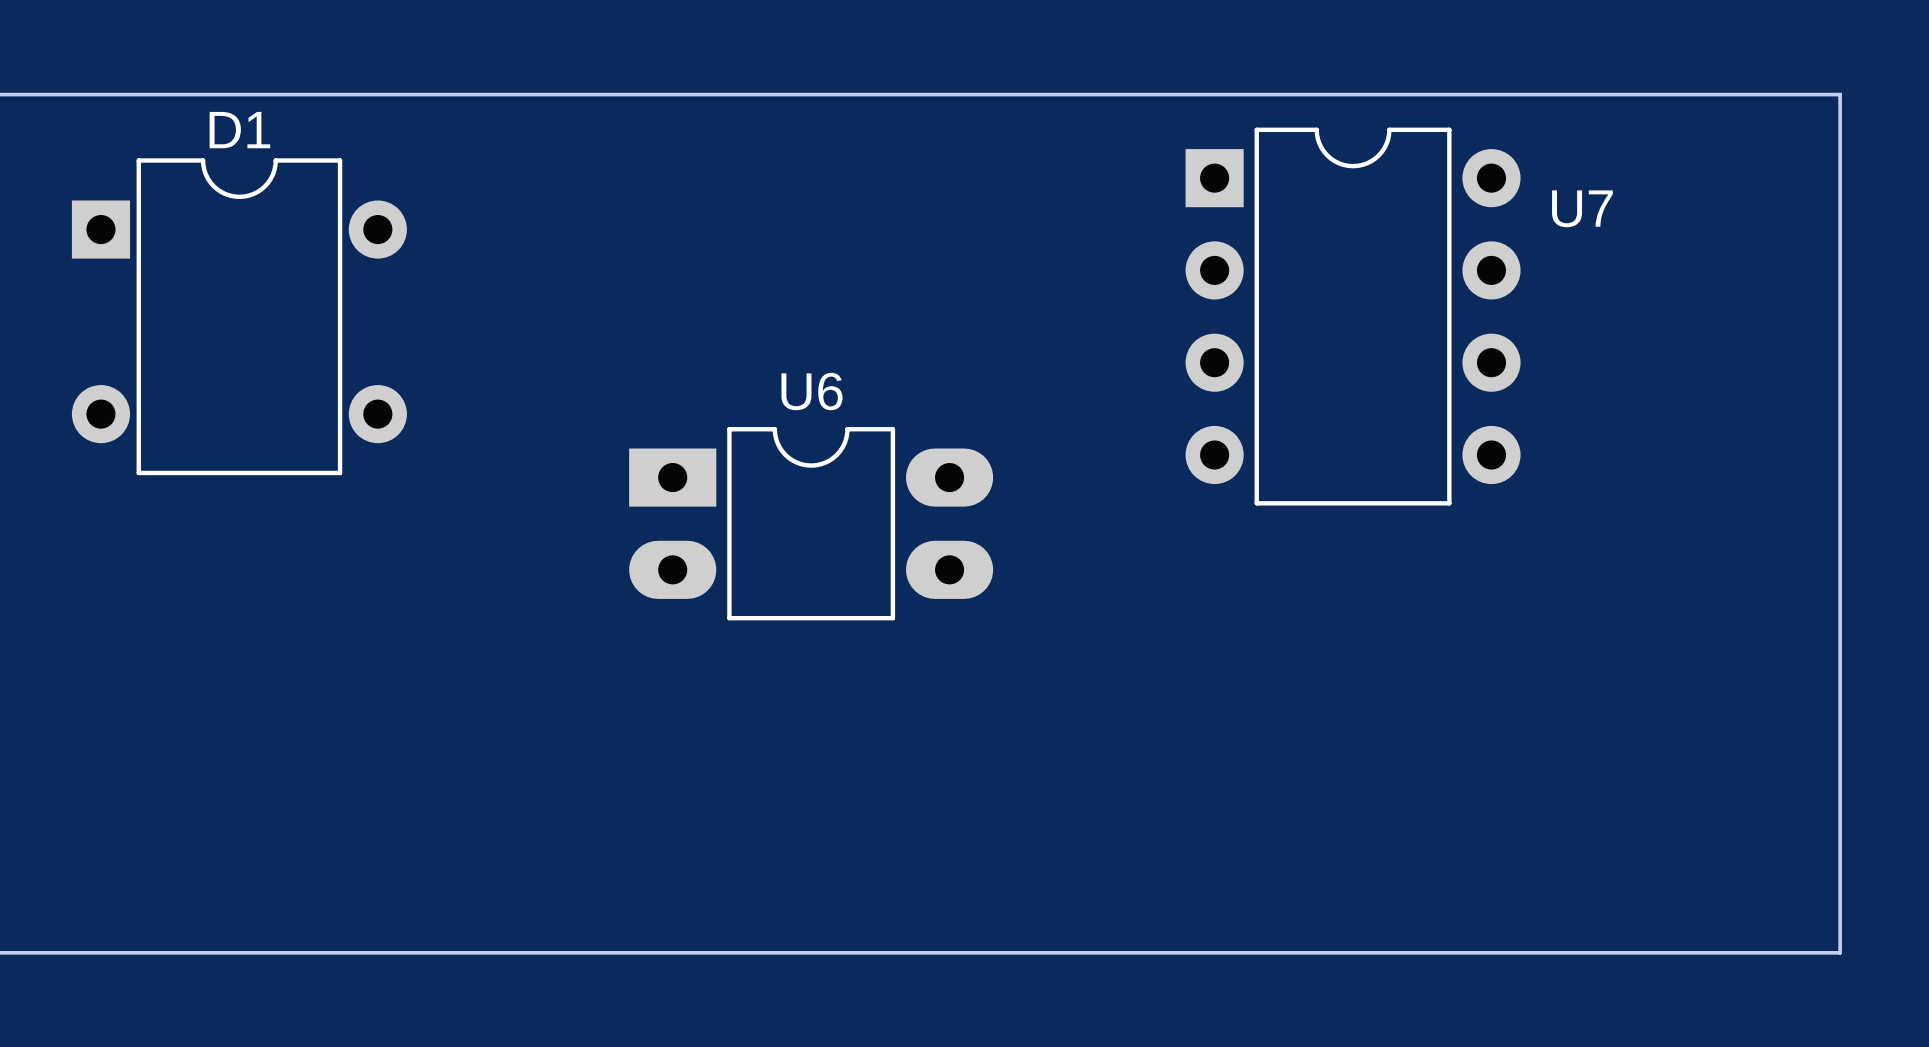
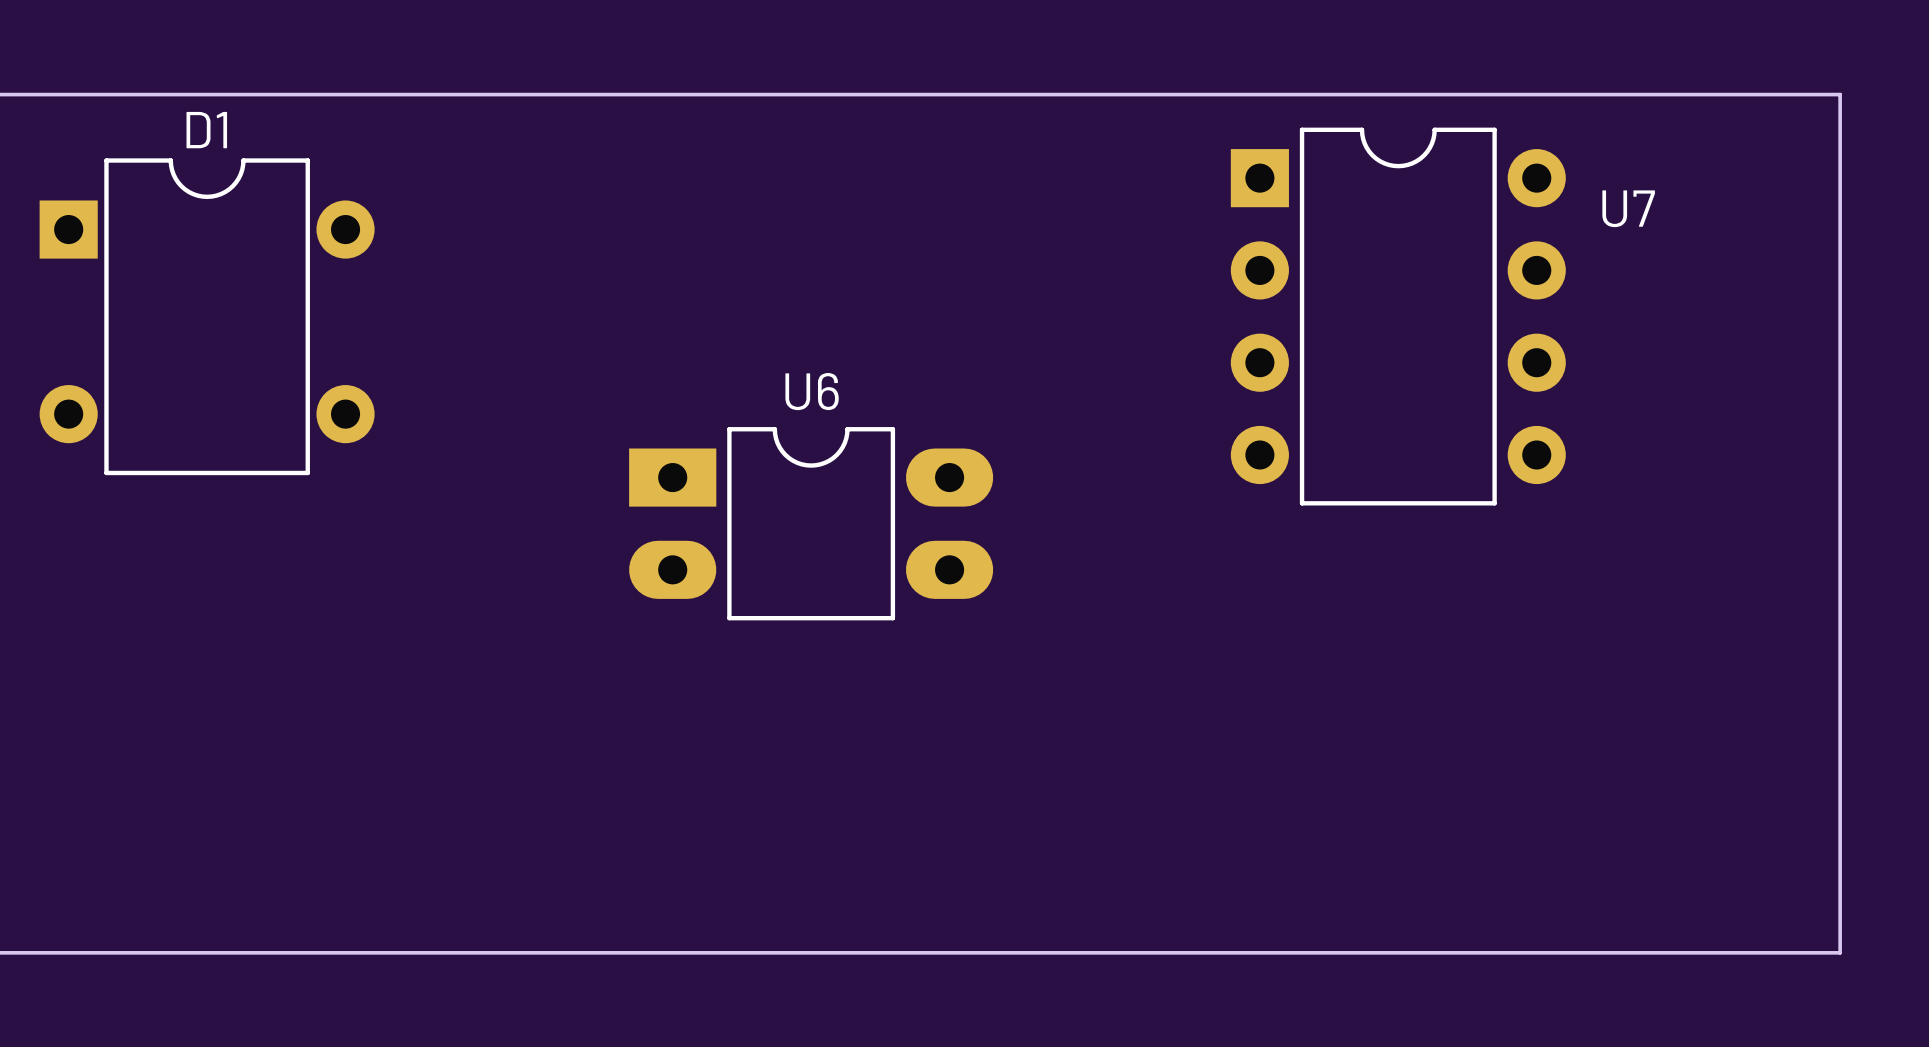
D1 position: (239, 316) -> (207, 316)
U7 position: (1353, 316) -> (1398, 316)

